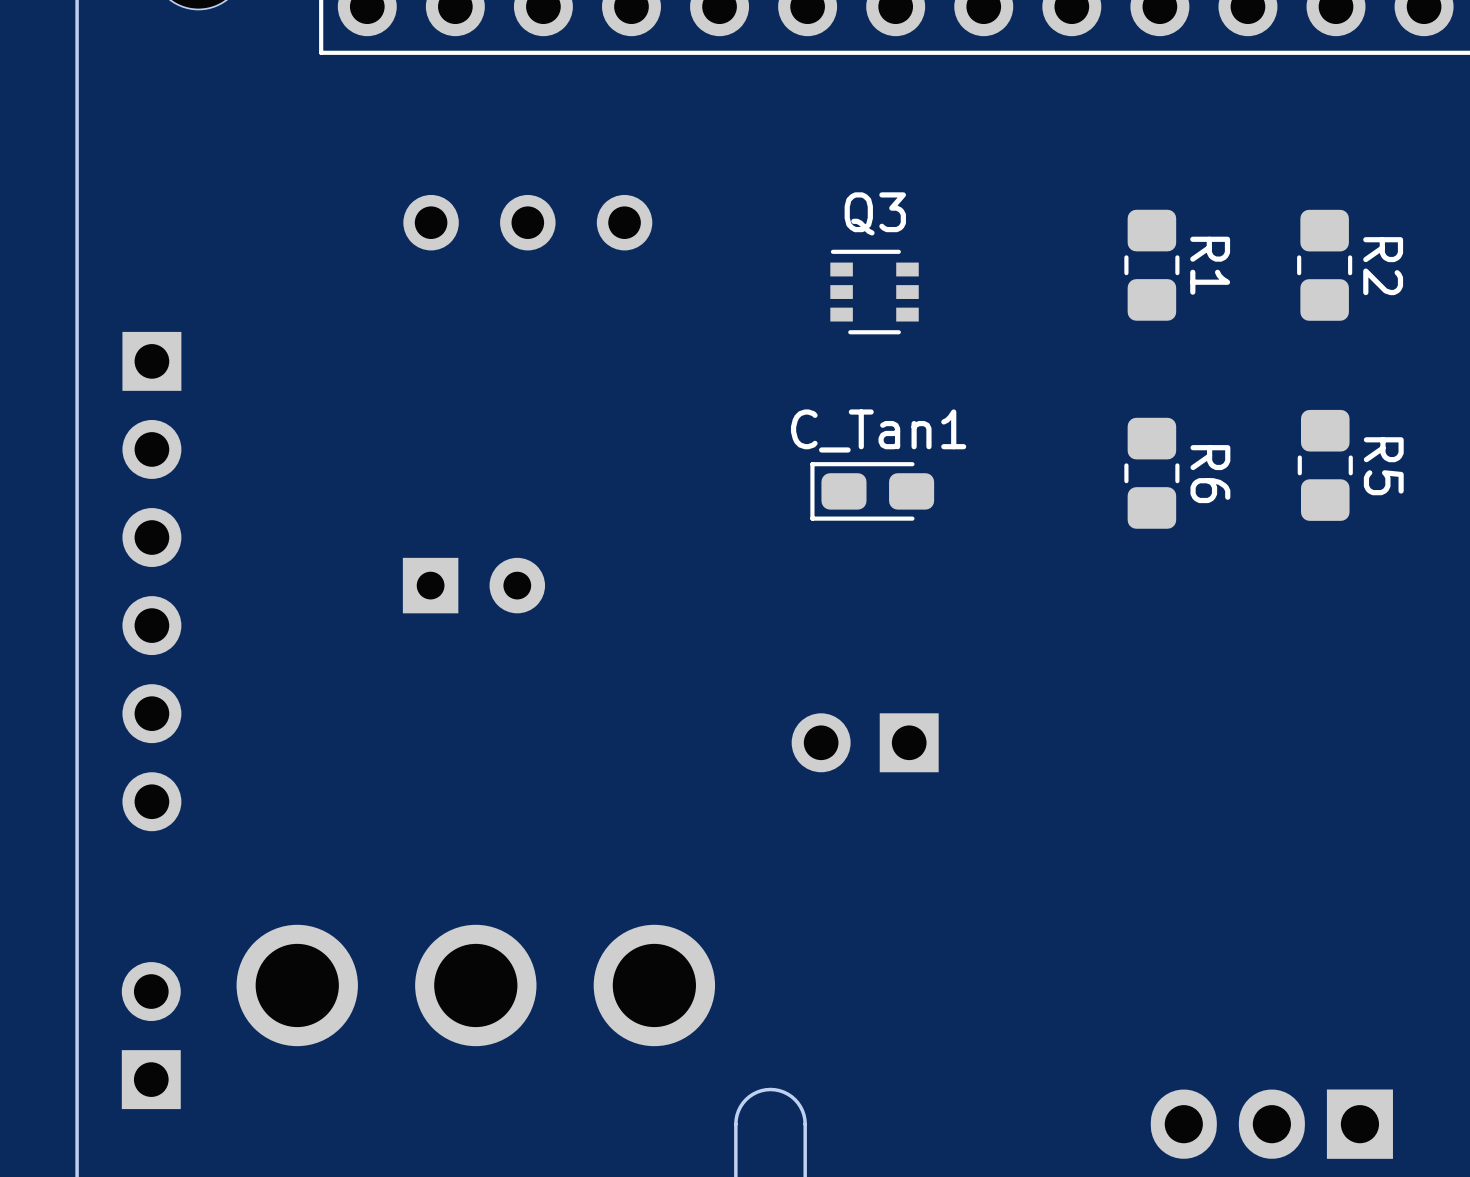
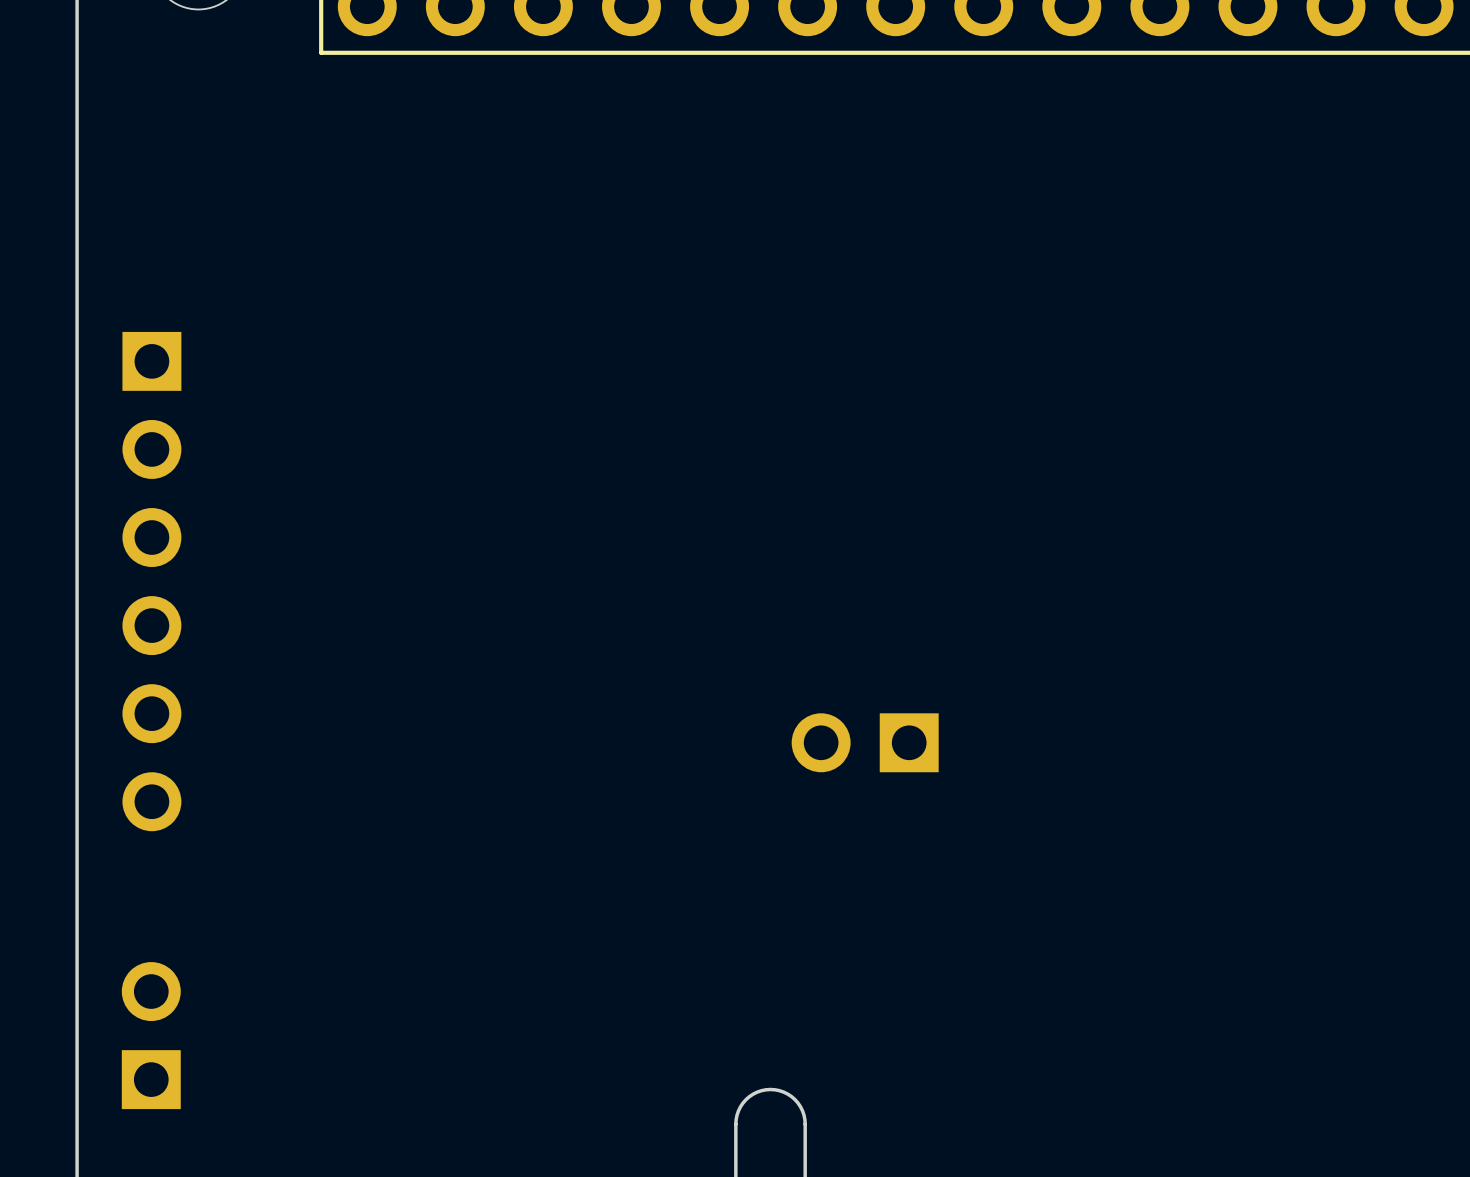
part: (527, 222) -> none
R1: (1151, 265) -> none
R2: (1324, 265) -> none
Q3: (874, 292) -> none
R5: (1325, 465) -> none
R6: (1151, 473) -> none
C_Tan1: (872, 491) -> none
part: (473, 585) -> none
part: (475, 985) -> none
part: (1271, 1124) -> none

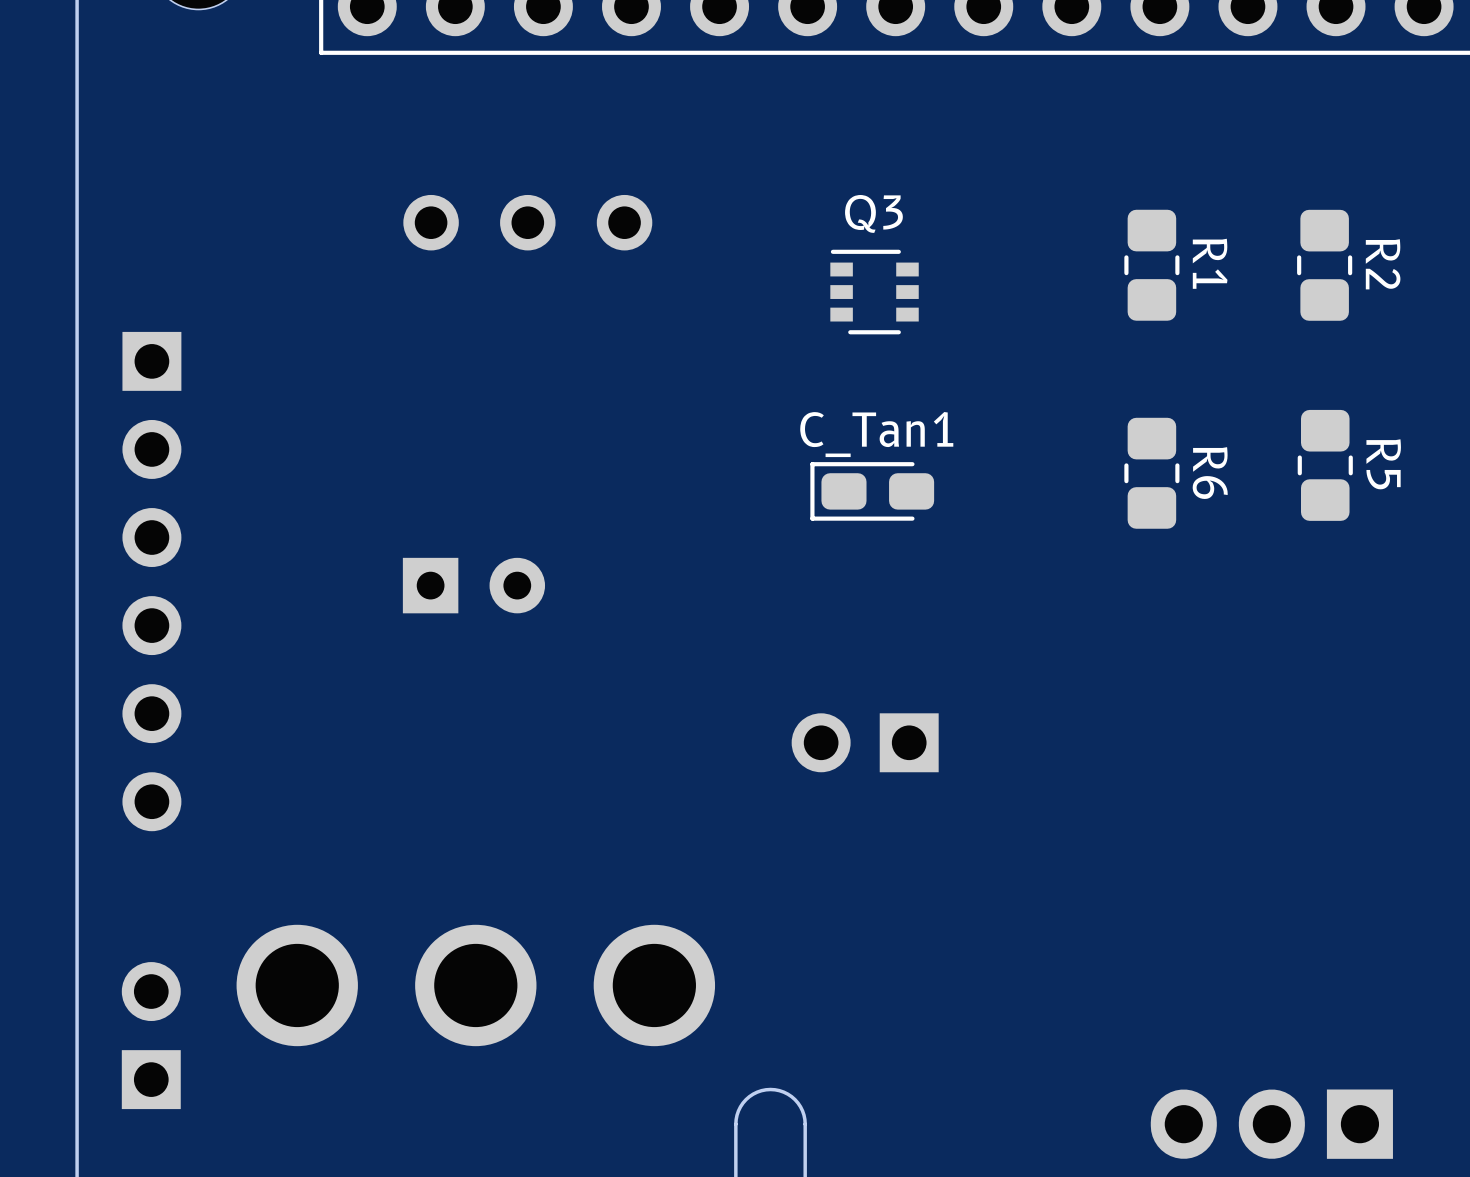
part: none -> (527, 222)
R1: none -> (1151, 265)
R2: none -> (1324, 265)
Q3: none -> (874, 292)
R5: none -> (1325, 465)
R6: none -> (1151, 473)
C_Tan1: none -> (872, 491)
part: none -> (473, 585)
part: none -> (475, 985)
part: none -> (1271, 1124)

